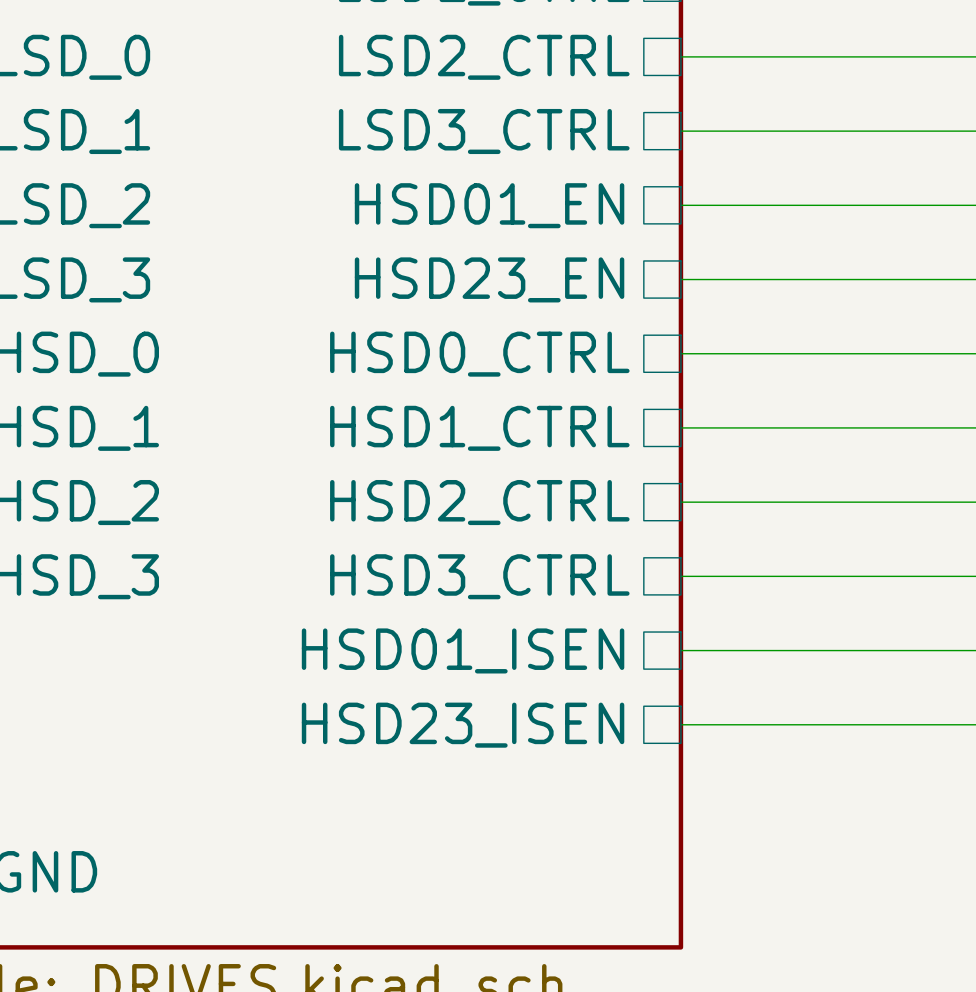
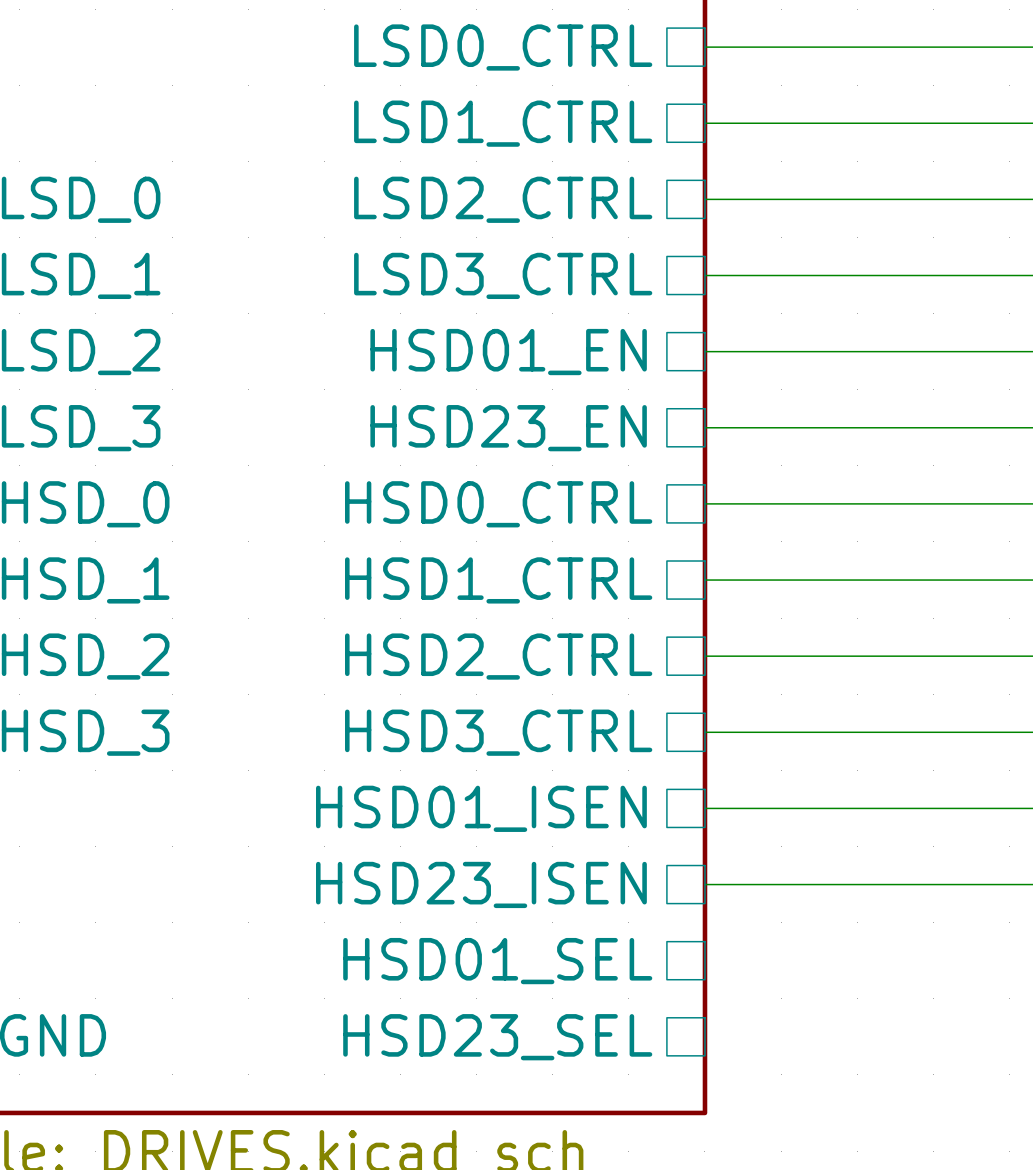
sheet pin: none -> HSD01_SEL (497, 961)
sheet pin: none -> HSD23_SEL (497, 1037)

